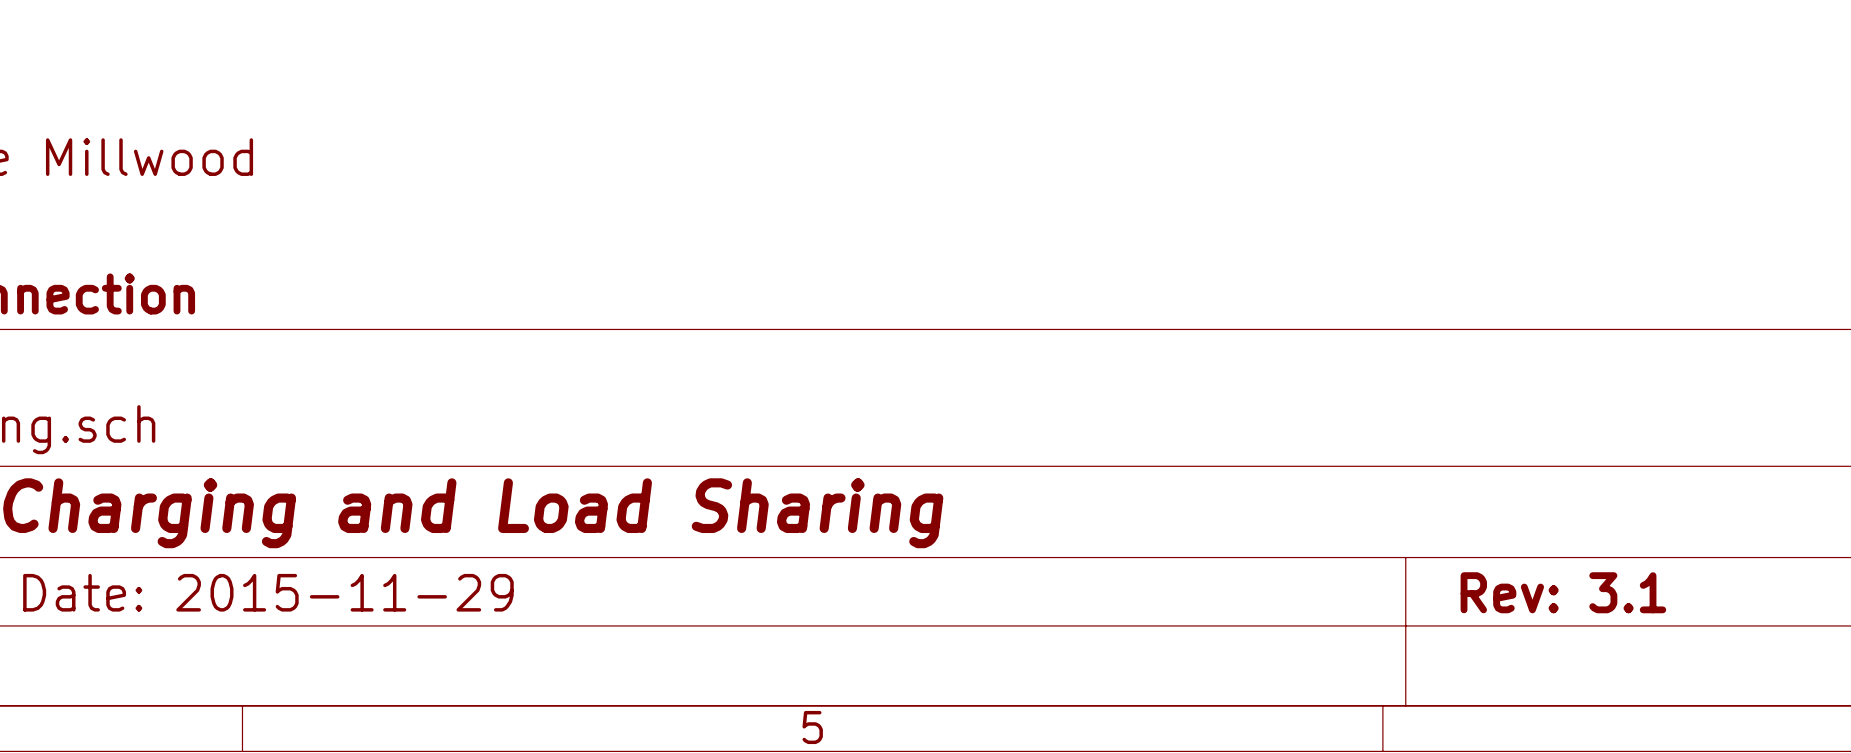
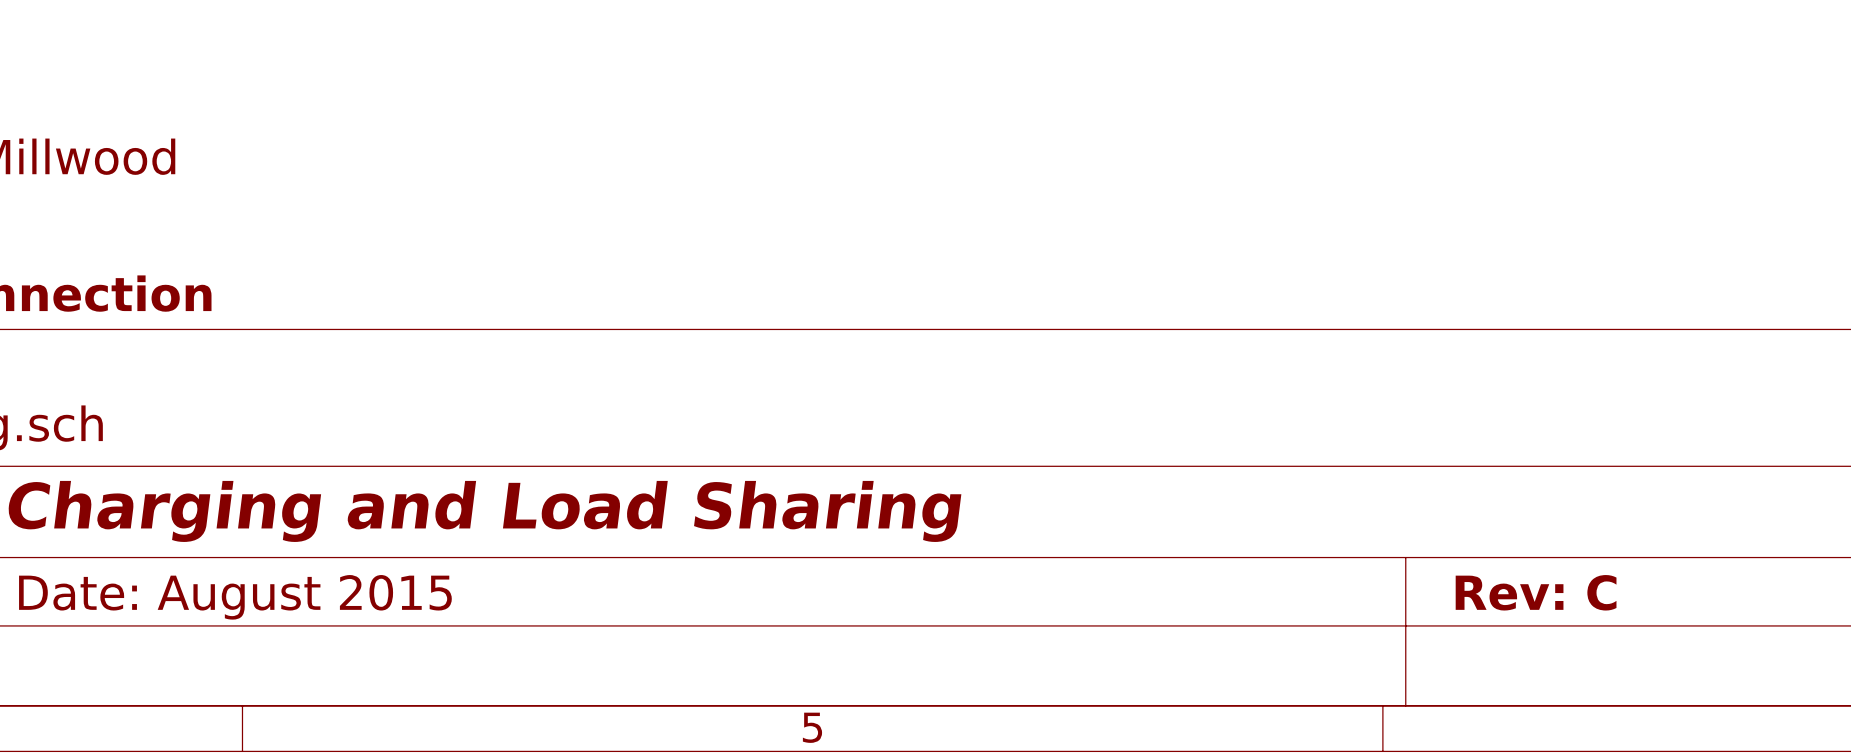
title block: Date: 2015-11-29 (268, 592) -> Date: August 2015 (235, 597)
title block: Rev: 3.1 (1563, 592) -> Rev: C (1536, 592)

